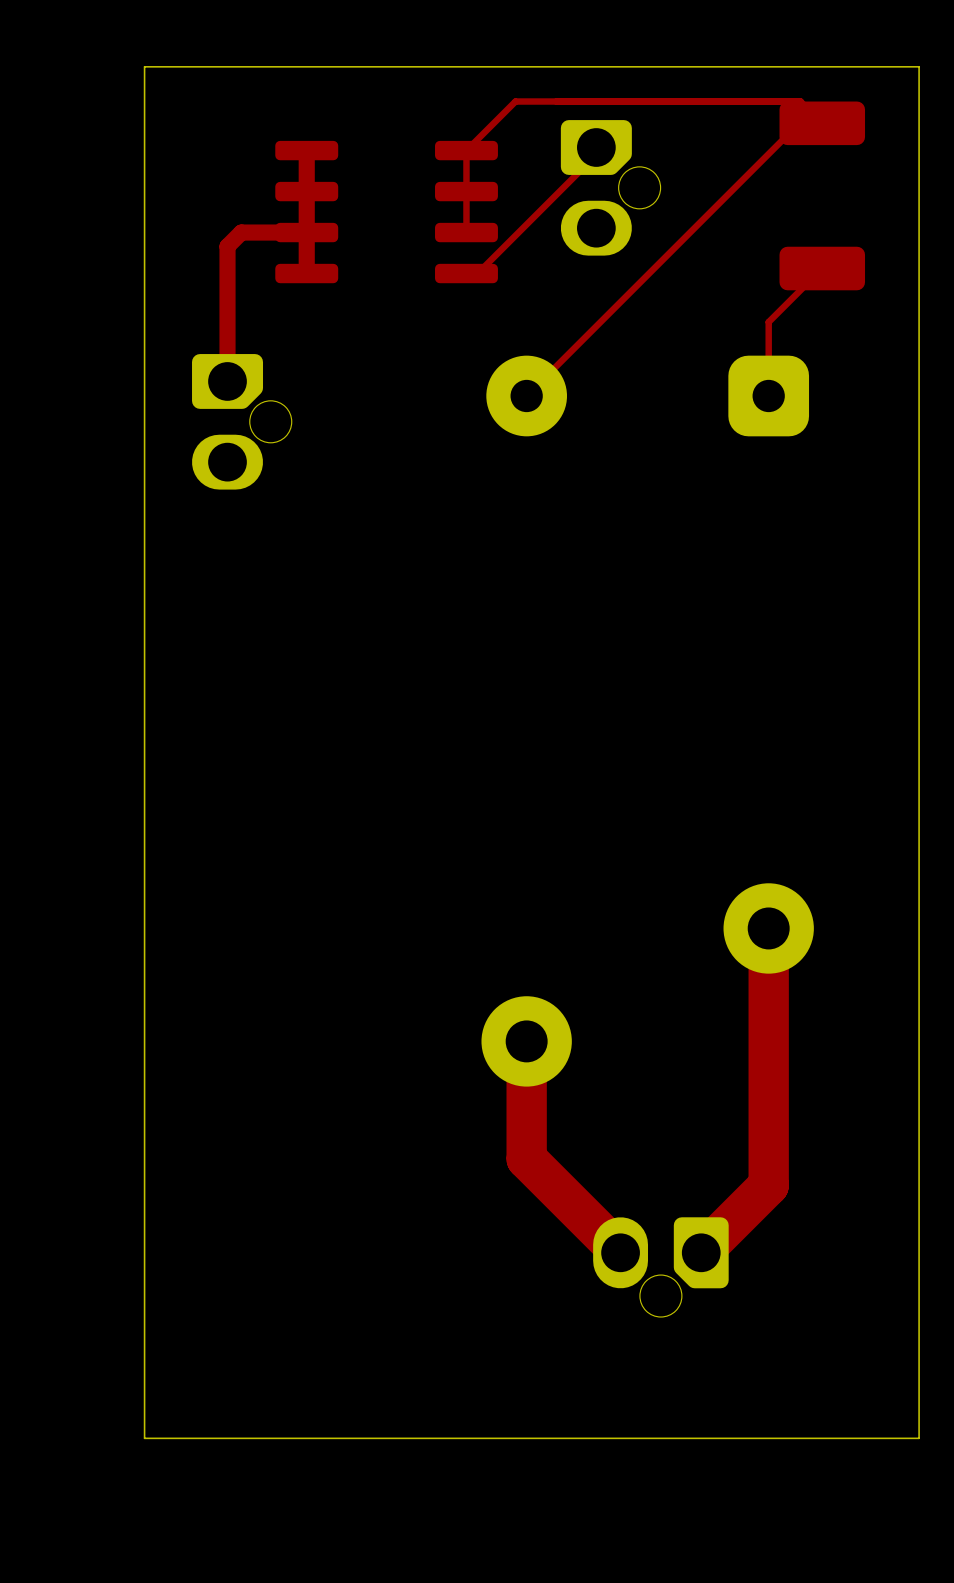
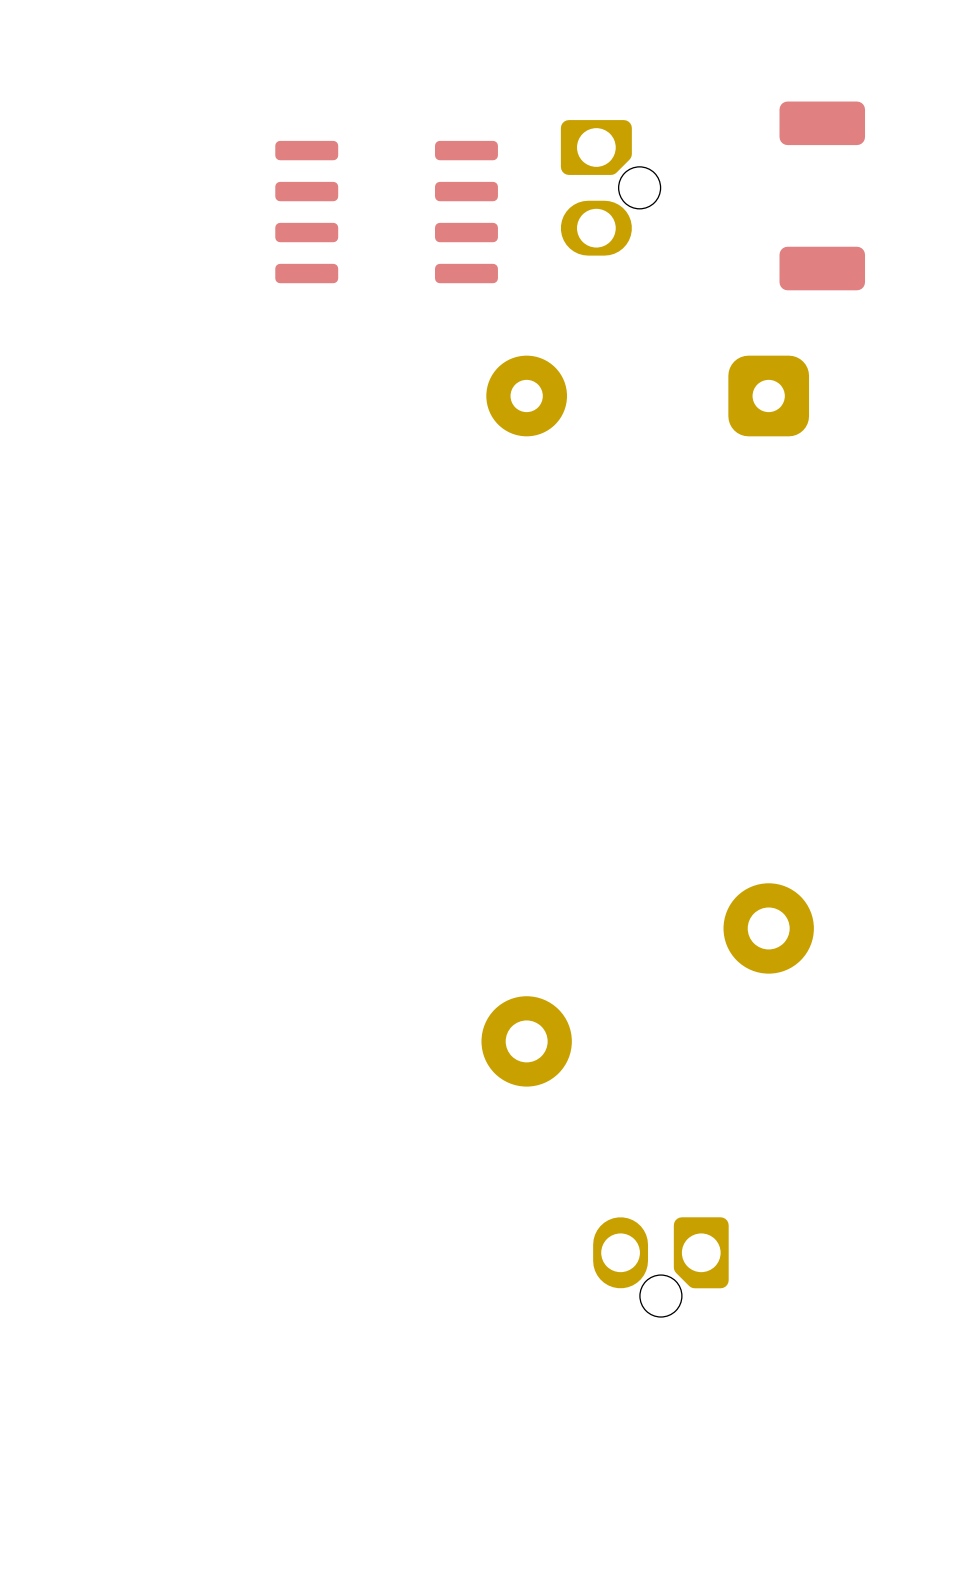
board edge: (919, 66) (144, 66) (144, 1438) (919, 1438) (919, 66) -> none
top track: (596, 147) (596, 154) (477, 273) (466, 273) -> none
top track: (306, 150) (306, 273) -> none
top track: (306, 232) (241, 232) (227, 246) (227, 381) -> none
top track: (466, 232) (466, 150) (515, 101) (800, 101) (822, 123) (799, 123) (526, 395) -> none
top track: (822, 268) (768, 322) (768, 395) -> none
part: (241, 421) -> none
top track: (768, 928) (768, 1185) (701, 1252) -> none
top track: (526, 1041) (526, 1158) (620, 1252) -> none

